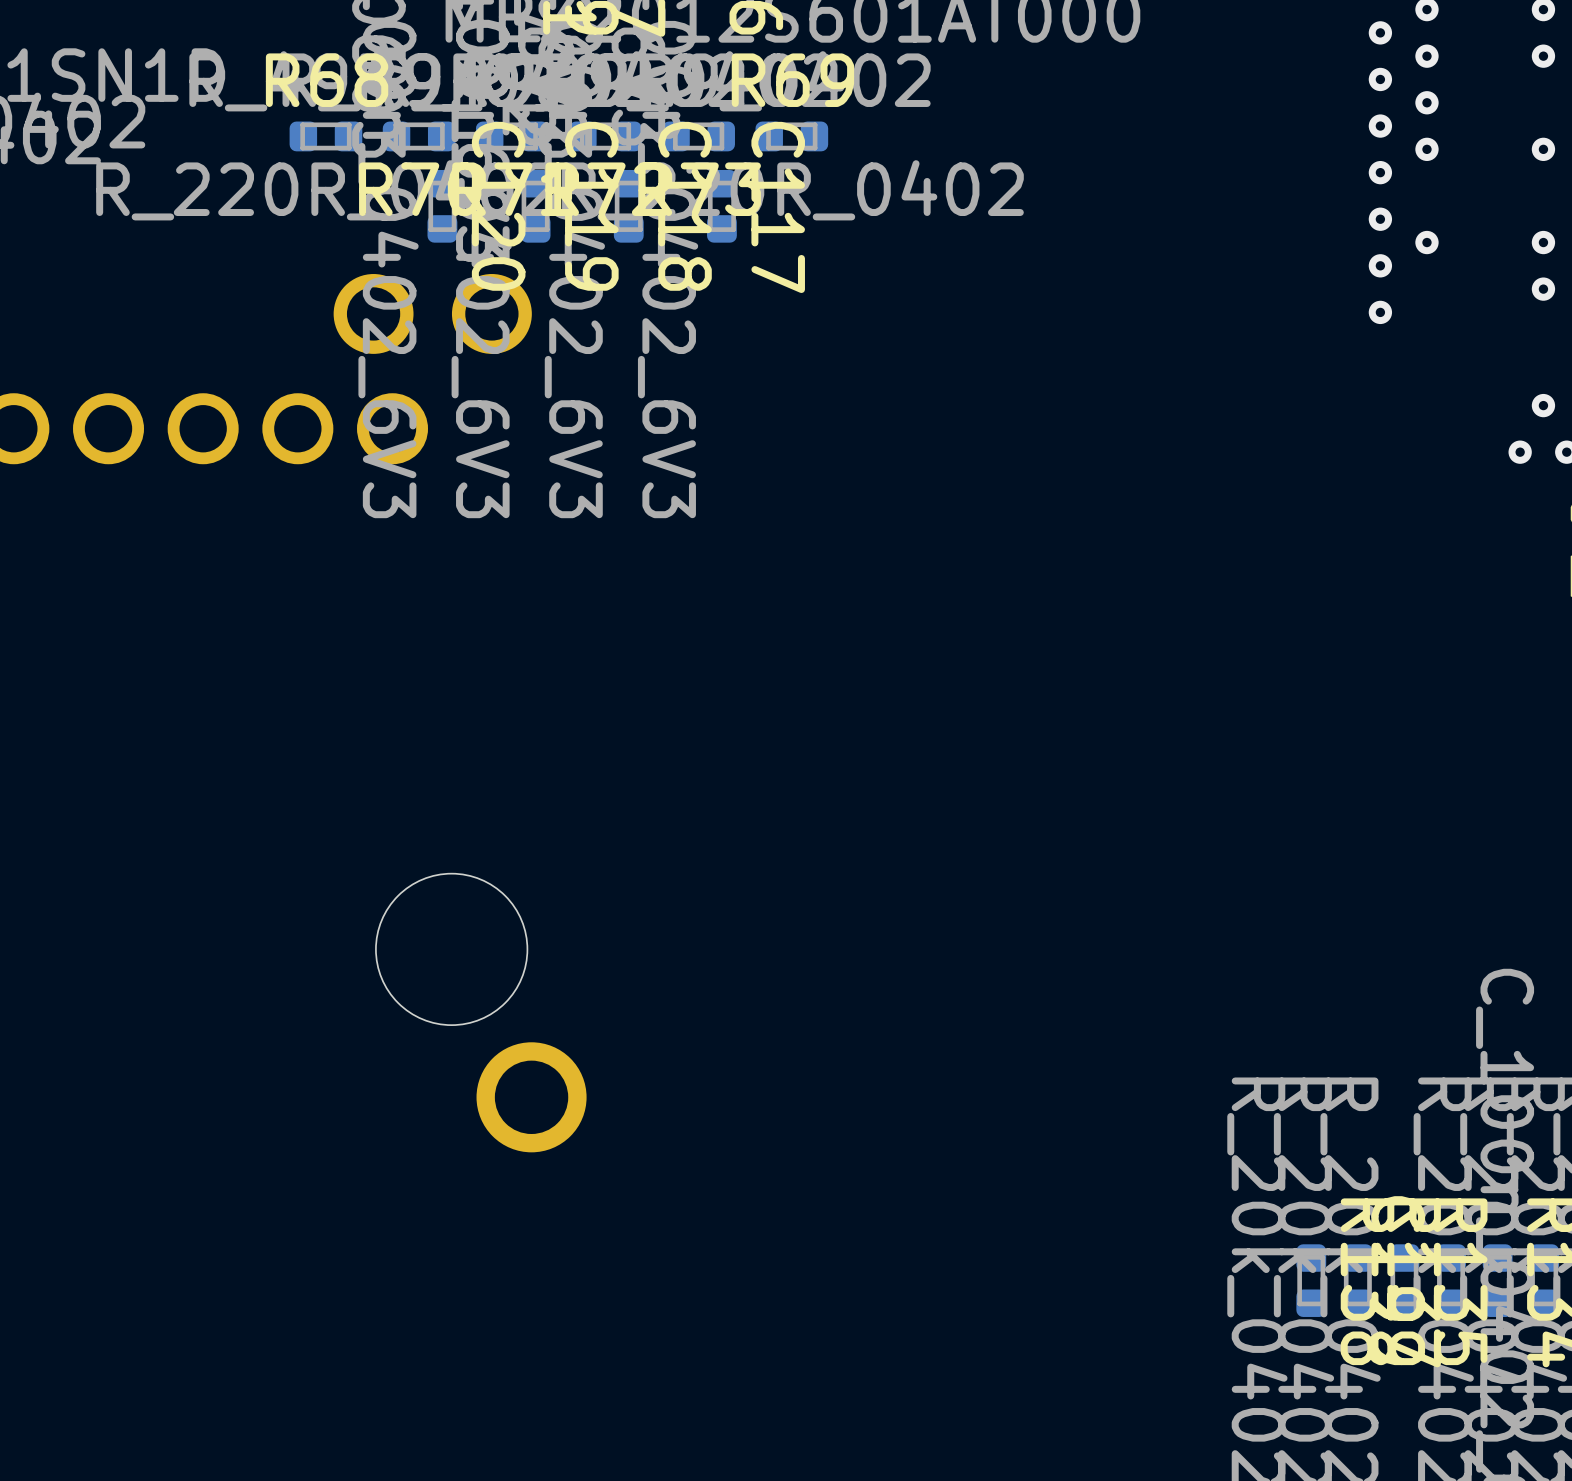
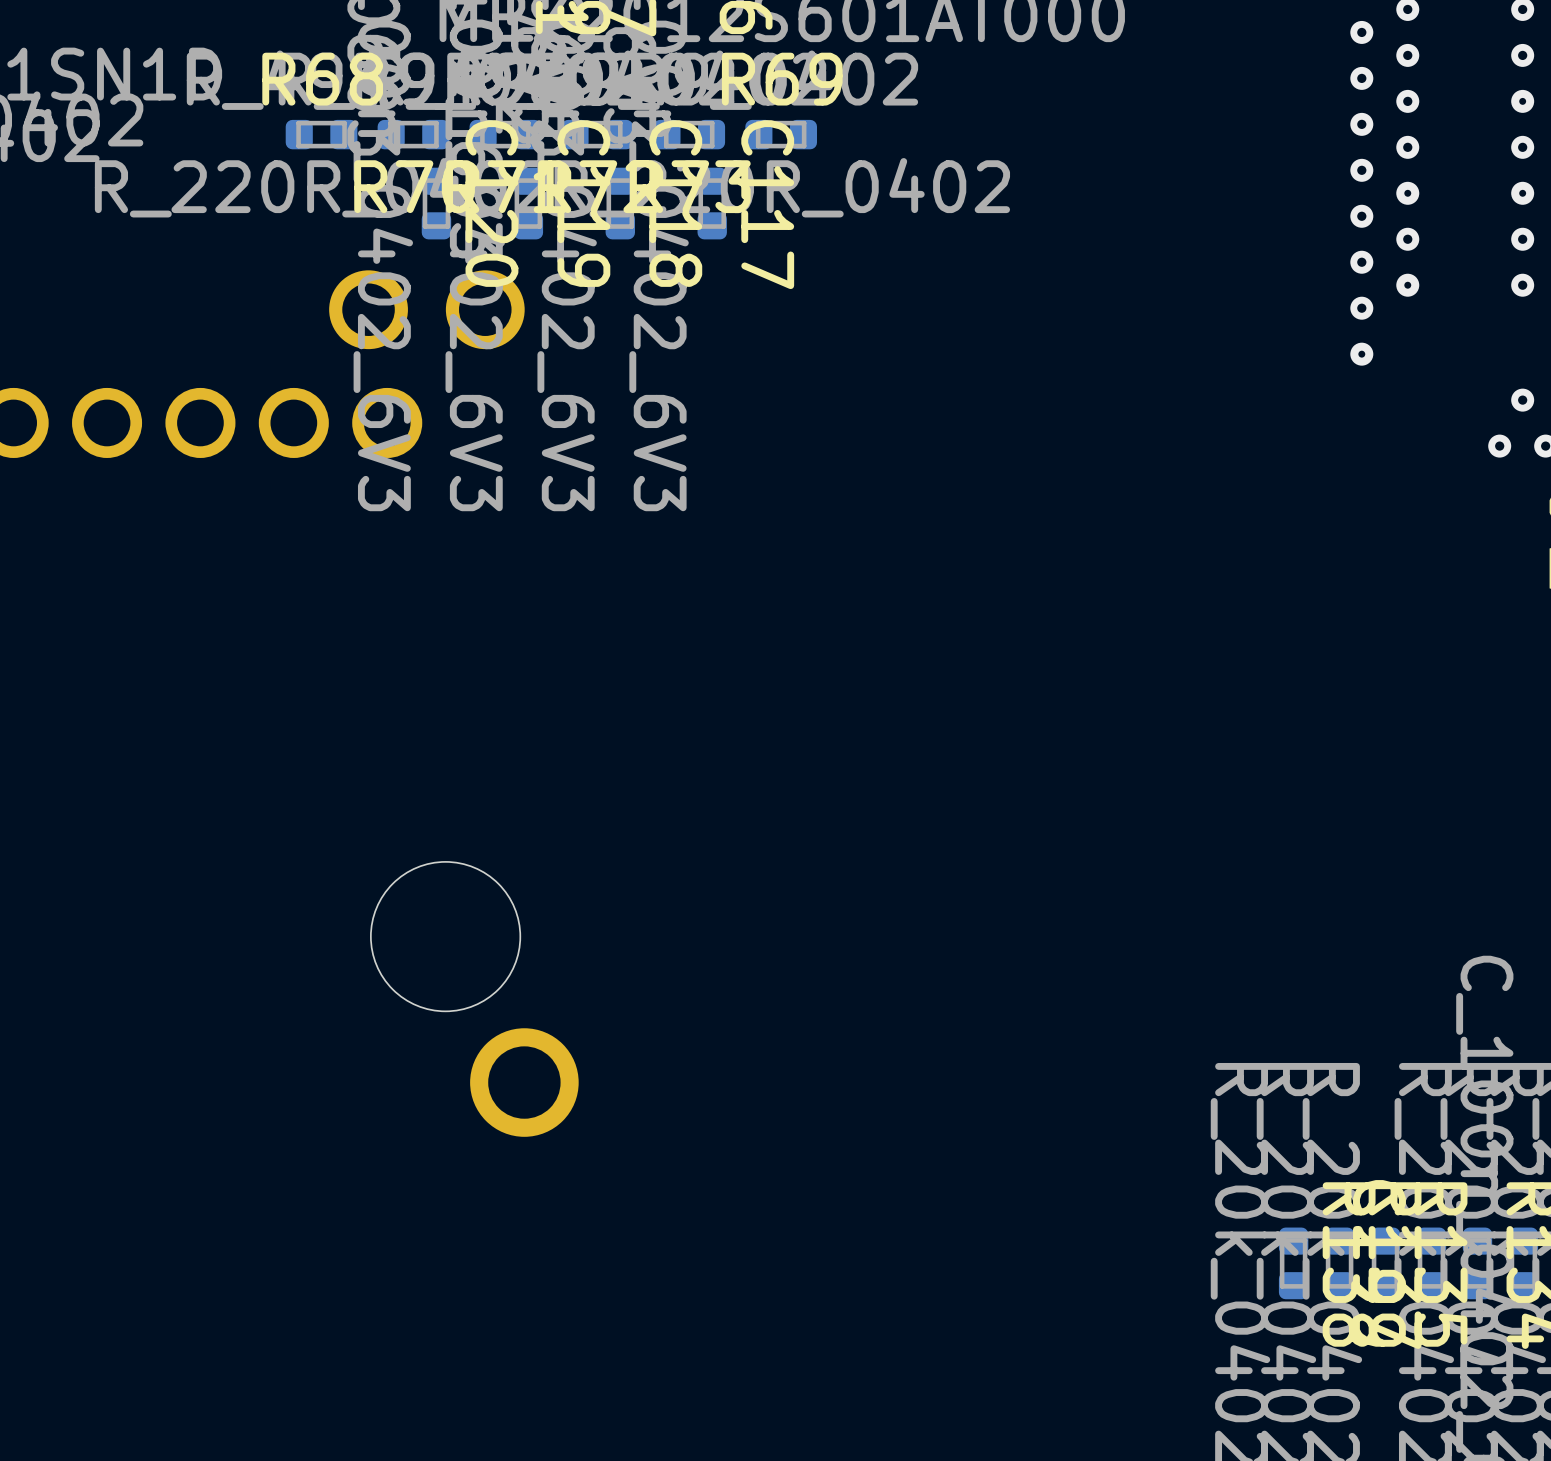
via: none -> (1522, 101)
via: none -> (1407, 193)
via: none -> (1522, 193)
via: none -> (1407, 285)
via: none -> (1361, 354)

